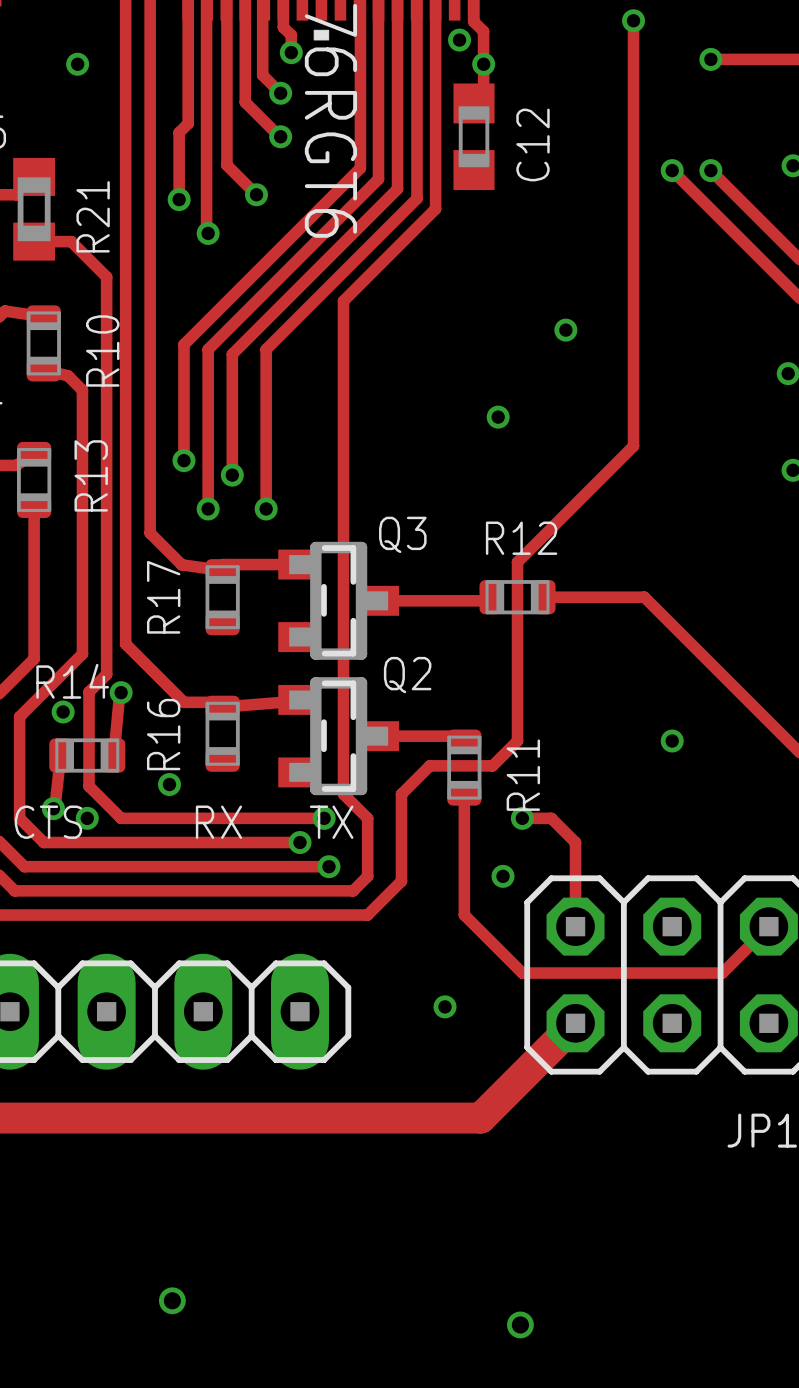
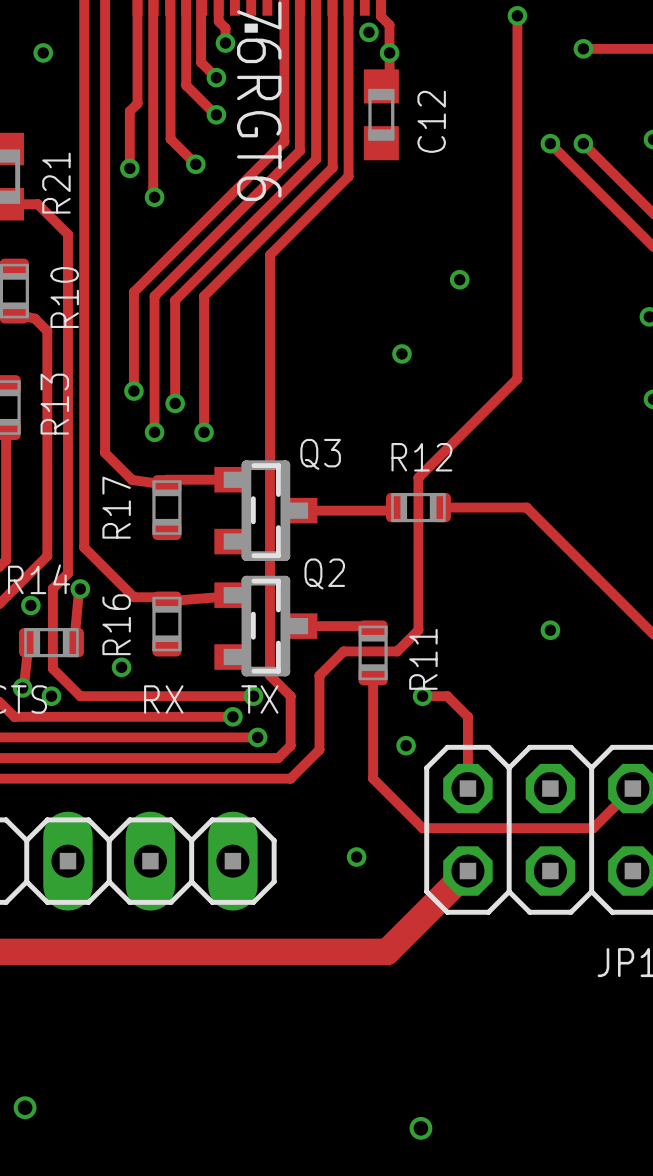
via position: (172, 1300) -> (25, 1107)

